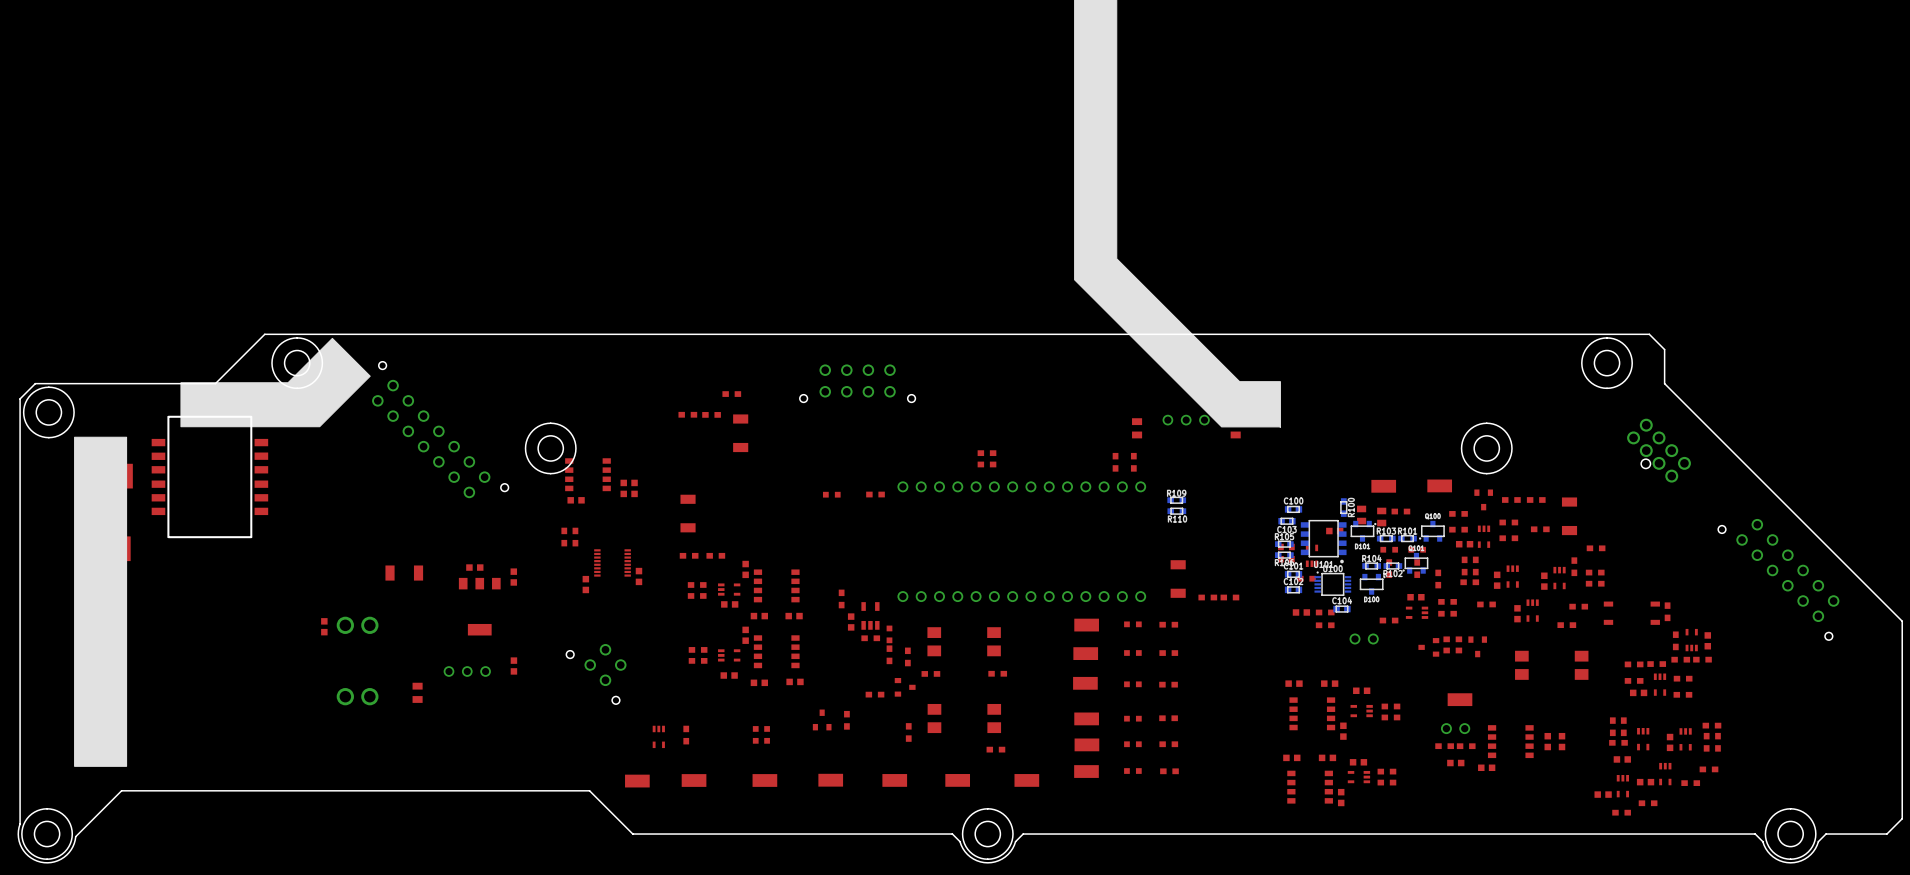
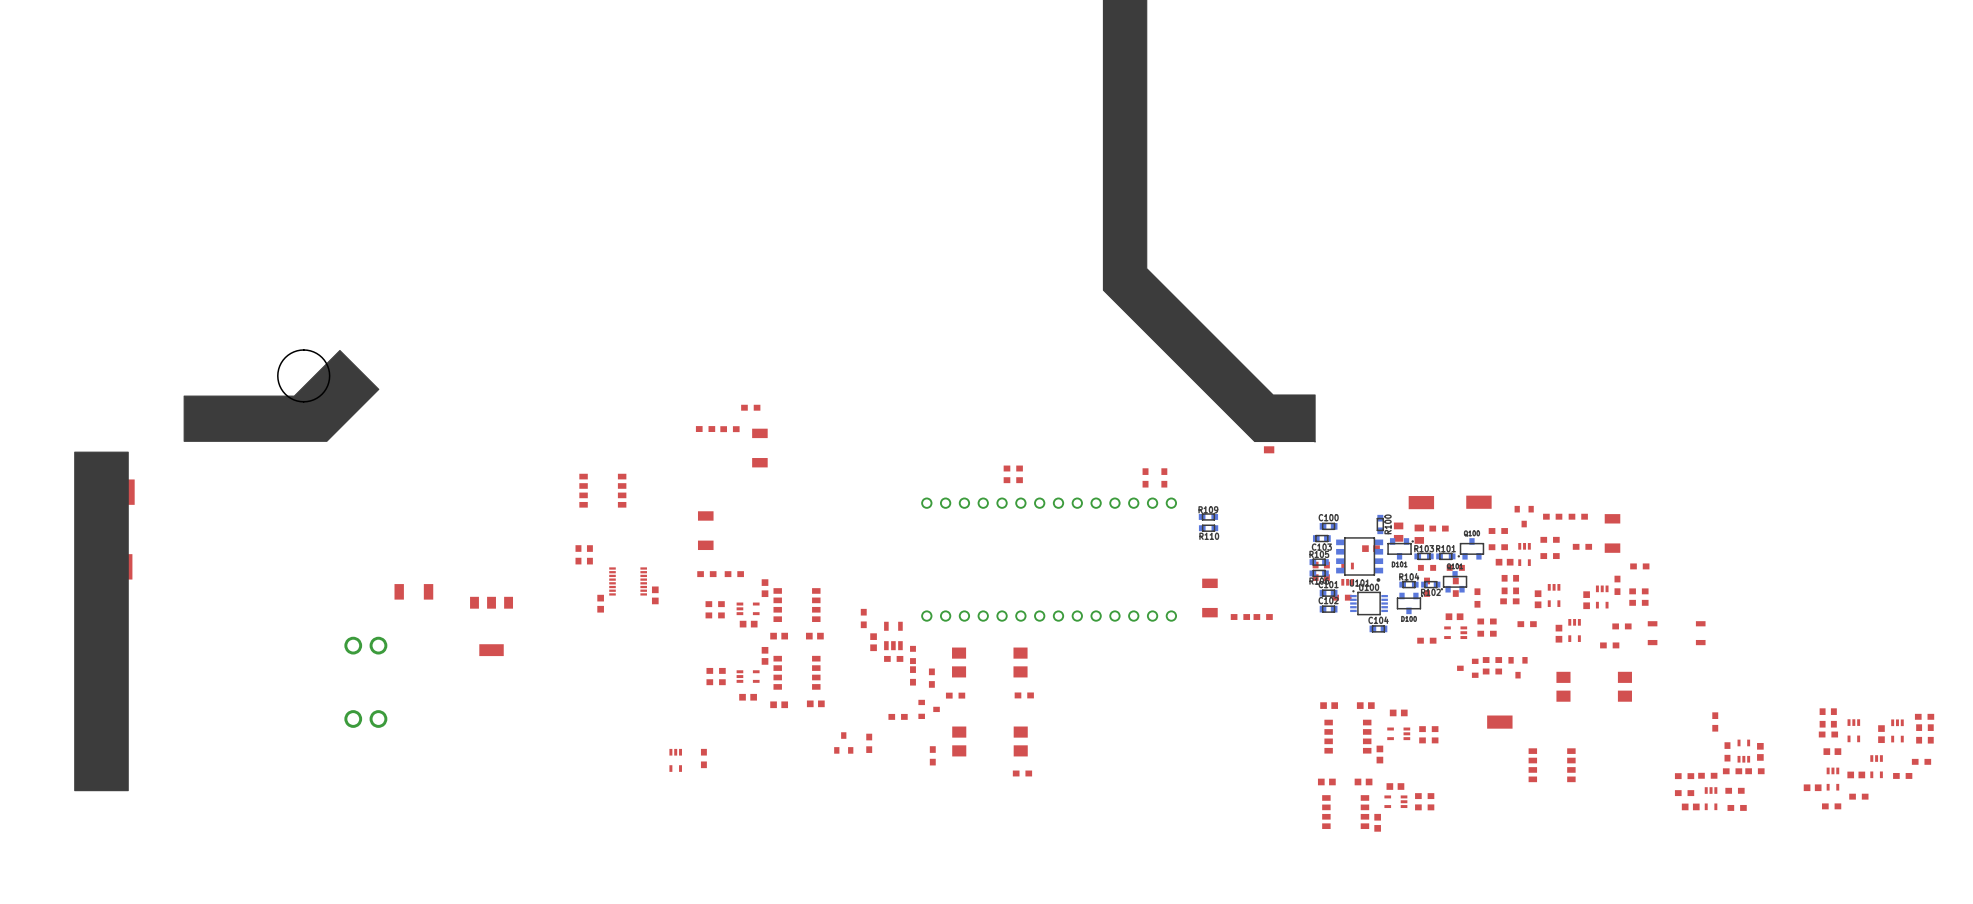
board edge: (1649, 334) (264, 334) (215, 383) (35, 383) (20, 398) (19, 841) (25, 853) (34, 859) (47, 862) (61, 859) (71, 849) (75, 836) (121, 790) (589, 790) (632, 834) (952, 834) (970, 856) (987, 862) (1005, 856) (1023, 834) (1755, 834) (1773, 856) (1790, 862) (1808, 856) (1826, 834) (1886, 834) (1902, 818) (1902, 621) (1664, 383) (1664, 349) (1649, 334) -> none
board edge: (1607, 337) (1616, 339) (1624, 345) (1630, 353) (1632, 363) (1630, 372) (1624, 380) (1616, 386) (1607, 388) (1597, 386) (1589, 380) (1583, 372) (1581, 363) (1583, 353) (1589, 345) (1597, 339) (1607, 337) -> none
round board edge: [284, 350, 310, 376] -> none
round board edge: [1594, 350, 1620, 376] -> none
part: (857, 383) -> none
board edge: (48, 387) (58, 389) (66, 394) (72, 402) (74, 412) (72, 422) (66, 430) (58, 435) (48, 437) (39, 435) (31, 430) (25, 422) (23, 412) (25, 402) (31, 394) (39, 389) (48, 387) -> none
round board edge: [36, 399, 62, 426] -> none
part: (1186, 420) -> none
board edge: (550, 423) (560, 425) (568, 430) (574, 438) (575, 448) (574, 458) (568, 466) (560, 471) (550, 473) (541, 471) (532, 466) (527, 458) (525, 448) (527, 438) (532, 430) (541, 425) (550, 423) -> none
board edge: (1486, 423) (1496, 425) (1504, 430) (1510, 438) (1511, 448) (1510, 458) (1504, 466) (1496, 471) (1486, 473) (1477, 471) (1468, 466) (1463, 458) (1461, 448) (1463, 438) (1468, 430) (1477, 425) (1486, 423) -> none
part: (1137, 428) -> none
part: (440, 429) -> none
round board edge: [537, 435, 564, 462] -> none
round board edge: [1473, 435, 1500, 462] -> none
part: (1659, 450) -> none
part: (209, 476) -> none
part: (629, 482) -> none
part: (629, 493) -> none
part: (831, 494) -> none
part: (875, 494) -> none
part: (576, 500) -> none
part: (474, 567) -> none
part: (513, 577) -> none
part: (1778, 579) -> none
part: (1667, 611) -> none
part: (1301, 612) -> none
part: (1325, 612) -> none
part: (1132, 624) -> none
part: (1168, 624) -> none
part: (1086, 625) -> none
part: (1325, 625) -> none
part: (324, 626) -> none
part: (1364, 639) -> none
part: (1675, 640) -> none
part: (1691, 640) -> none
part: (1707, 640) -> none
part: (1085, 653) -> none
part: (1132, 653) -> none
part: (1168, 653) -> none
part: (1680, 659) -> none
part: (1702, 659) -> none
part: (1634, 664) -> none
part: (1656, 664) -> none
part: (513, 666) -> none
part: (467, 671) -> none
part: (596, 674) -> none
part: (1683, 678) -> none
part: (1634, 680) -> none
part: (1085, 683) -> none
part: (1132, 684) -> none
part: (1168, 684) -> none
part: (1660, 684) -> none
part: (417, 692) -> none
part: (1638, 692) -> none
part: (1682, 694) -> none
part: none -> (1924, 716)
part: none -> (1822, 717)
part: none -> (1833, 717)
part: none -> (1715, 721)
part: none -> (1853, 730)
part: none -> (1897, 730)
part: none -> (1828, 734)
part: none -> (1881, 734)
part: none -> (1919, 733)
part: none -> (1930, 733)
part: (1086, 718) -> none
part: (1132, 718) -> none
part: (1168, 718) -> none
part footprint: [1702, 722, 1722, 729] -> [1757, 742, 1764, 761]
part: (1612, 726) -> none
part: (1623, 726) -> none
part: (1455, 728) -> none
part: none -> (1727, 751)
part: none -> (1832, 751)
part: (755, 734) -> none
part: (767, 734) -> none
part: none -> (1921, 761)
part: (1643, 739) -> none
part rotation: 0° (1685, 739) -> 180° (1743, 751)
part position: (1685, 739) -> (1743, 751)
part: (1547, 741) -> none
part: (1562, 741) -> none
part: (1618, 742) -> none
part: (1670, 742) -> none
part rotation: 0° (1706, 742) -> 90° clockwise (1754, 771)
part: (1717, 742) -> none
part: none -> (1876, 766)
part: (1086, 744) -> none
part: (1132, 744) -> none
part: (1168, 744) -> none
part: (1444, 746) -> none
part: (1466, 746) -> none
part: none -> (1732, 771)
part: none -> (1707, 775)
part: none -> (1856, 774)
part: none -> (1684, 776)
part: none -> (1902, 775)
part: none -> (1832, 779)
part: (1622, 759) -> none
part: (1455, 763) -> none
part: none -> (1812, 787)
part: none -> (1734, 790)
part: (1486, 767) -> none
part: none -> (1684, 793)
part: (1708, 769) -> none
part: (1086, 771) -> none
part: (1132, 771) -> none
part: (1169, 771) -> none
part: none -> (1858, 796)
part: (694, 780) -> none
part: (764, 780) -> none
part: (830, 780) -> none
part: (894, 780) -> none
part: (957, 780) -> none
part: (1026, 780) -> none
part: (637, 781) -> none
part: none -> (1831, 806)
part: (1622, 786) -> none
part: (1603, 794) -> none
part: (1648, 803) -> none
board edge: (47, 808) (56, 810) (64, 816) (70, 824) (72, 834) (70, 843) (64, 851) (56, 857) (47, 859) (37, 857) (29, 851) (23, 843) (21, 834) (23, 824) (29, 816) (37, 810) (47, 808) -> none
board edge: (987, 808) (997, 810) (1005, 816) (1011, 824) (1012, 834) (1011, 843) (1005, 851) (997, 857) (987, 859) (978, 857) (969, 851) (964, 843) (962, 834) (964, 824) (969, 816) (978, 810) (987, 808) -> none
board edge: (1790, 808) (1800, 810) (1808, 816) (1813, 824) (1815, 834) (1813, 843) (1808, 851) (1800, 857) (1790, 859) (1780, 857) (1772, 851) (1767, 843) (1765, 834) (1767, 824) (1772, 816) (1780, 810) (1790, 808) -> none
part: (1621, 812) -> none
round board edge: [34, 821, 60, 847] -> none
round board edge: [975, 821, 1001, 847] -> none
round board edge: [1777, 821, 1804, 847] -> none

